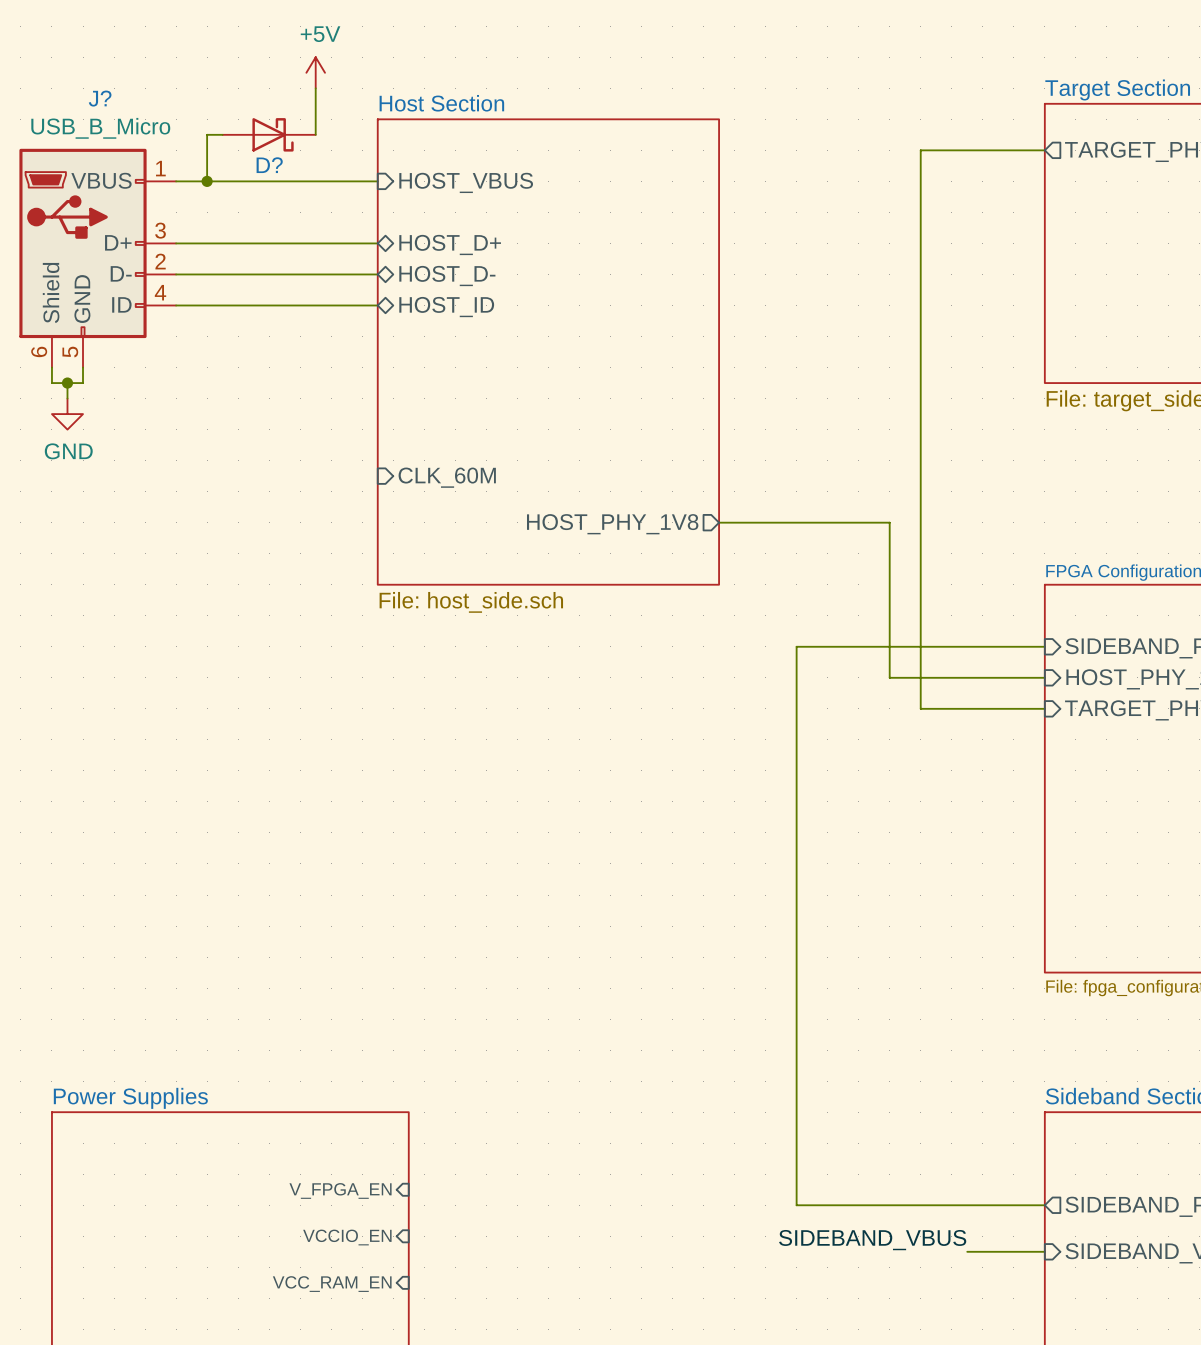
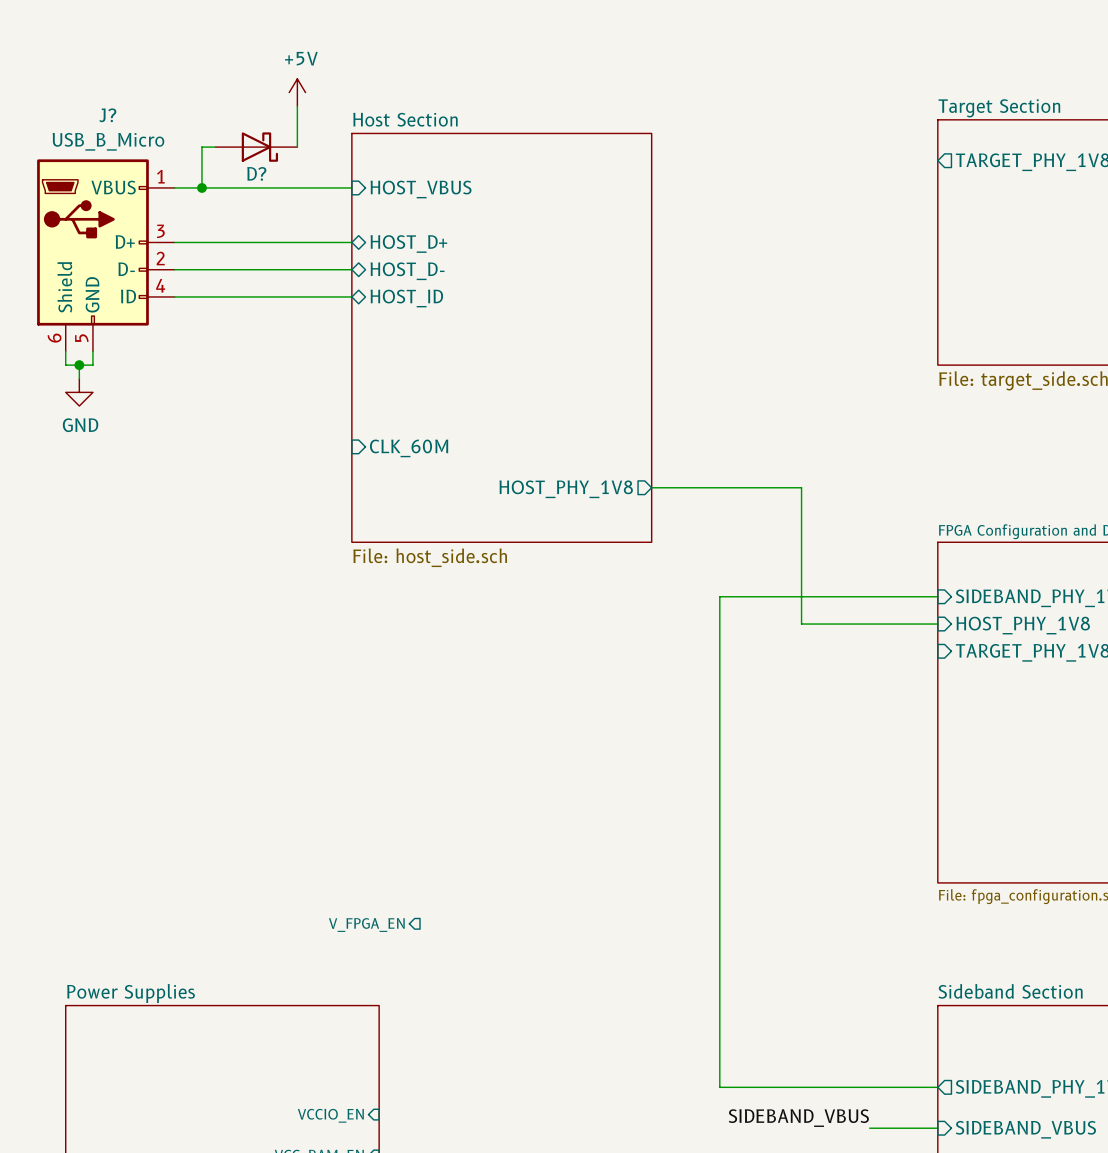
wire: (1044, 150) (920, 150) (920, 708) (1044, 708) -> none
sheet pin position: V_FPGA_EN (340, 1190) -> V_FPGA_EN (366, 925)

